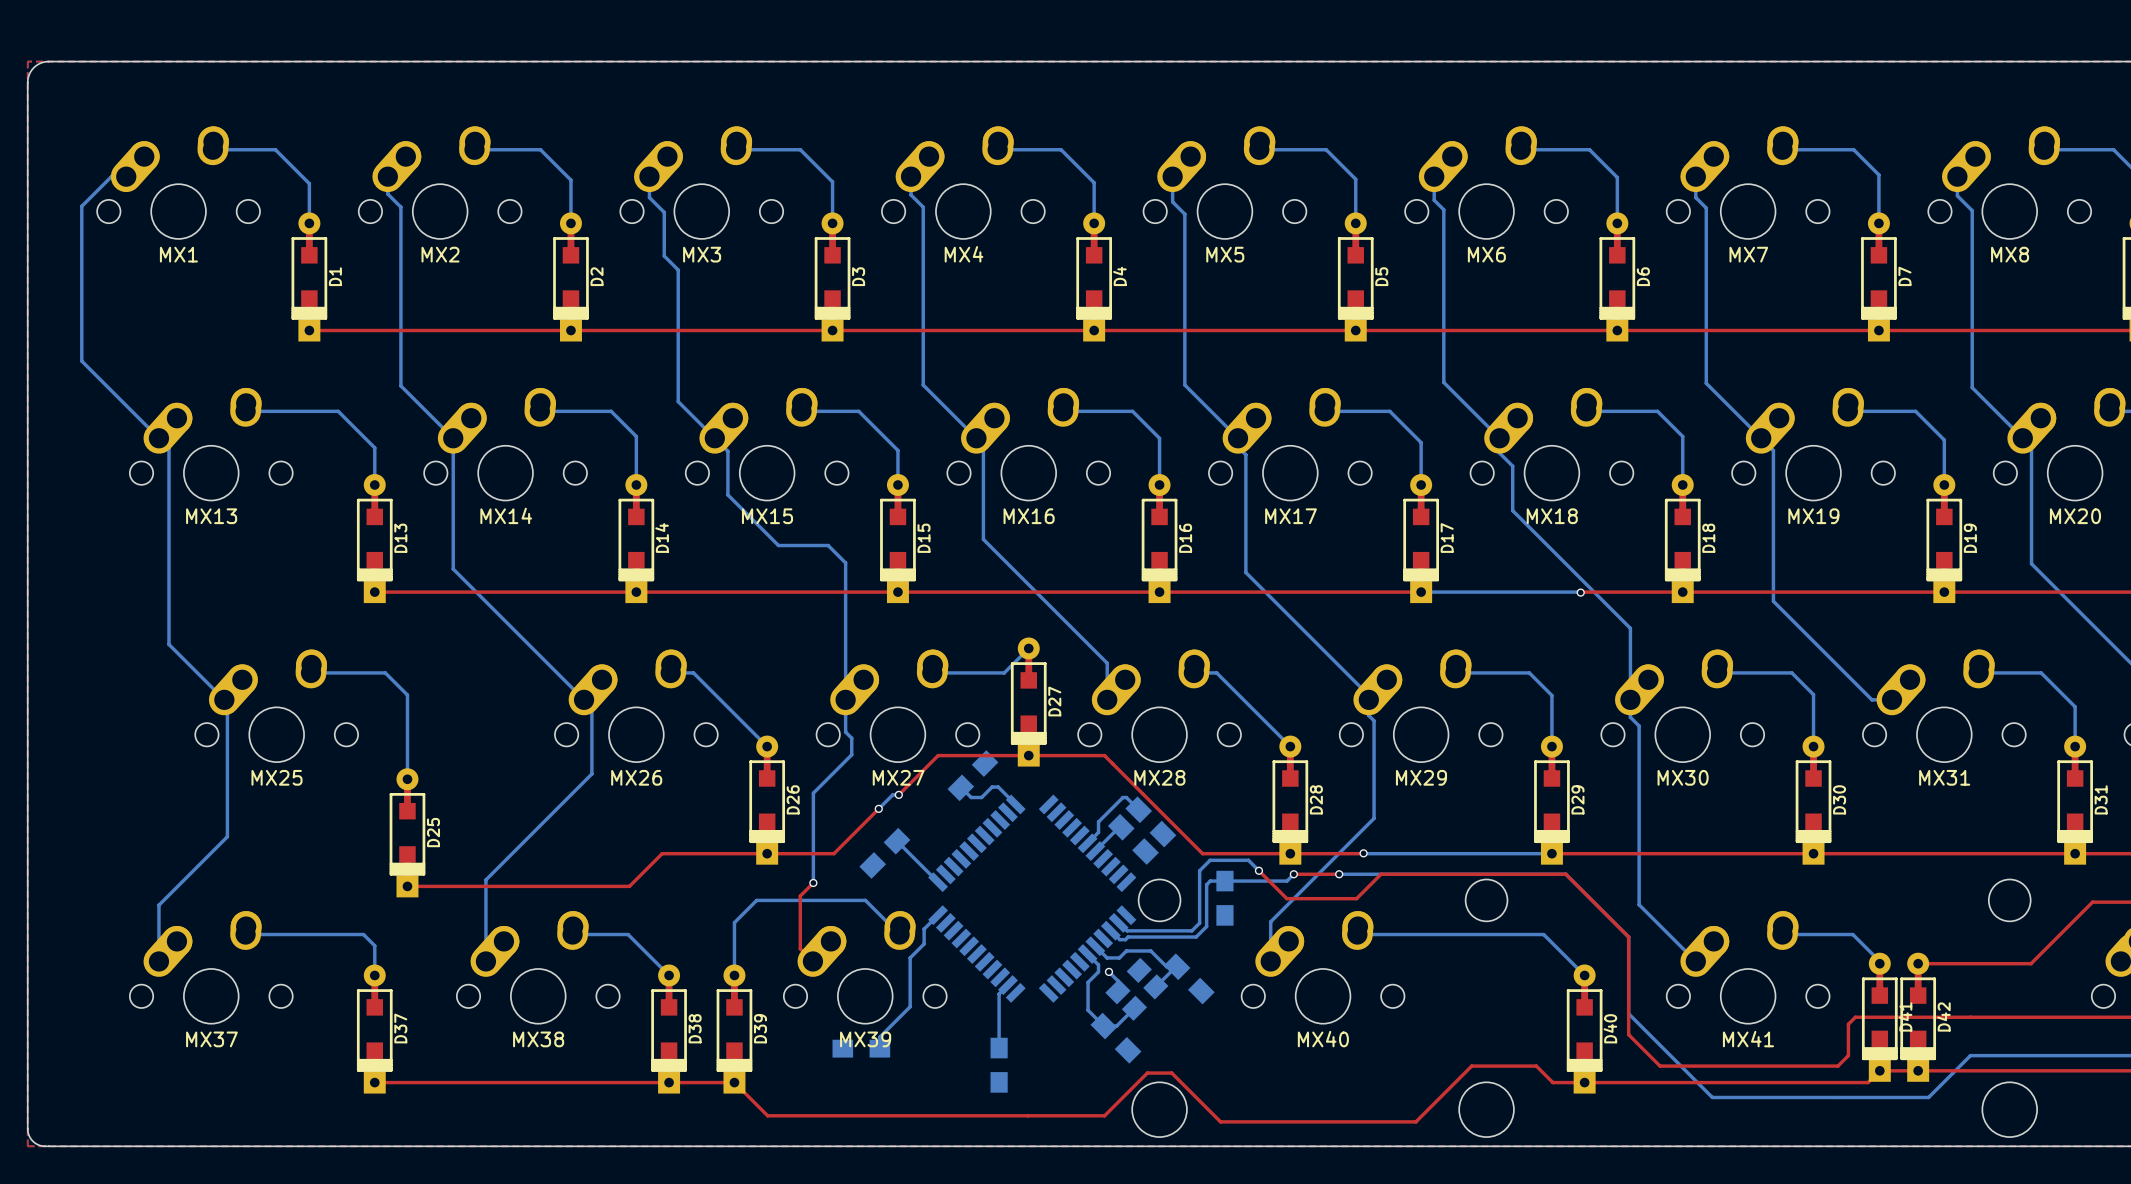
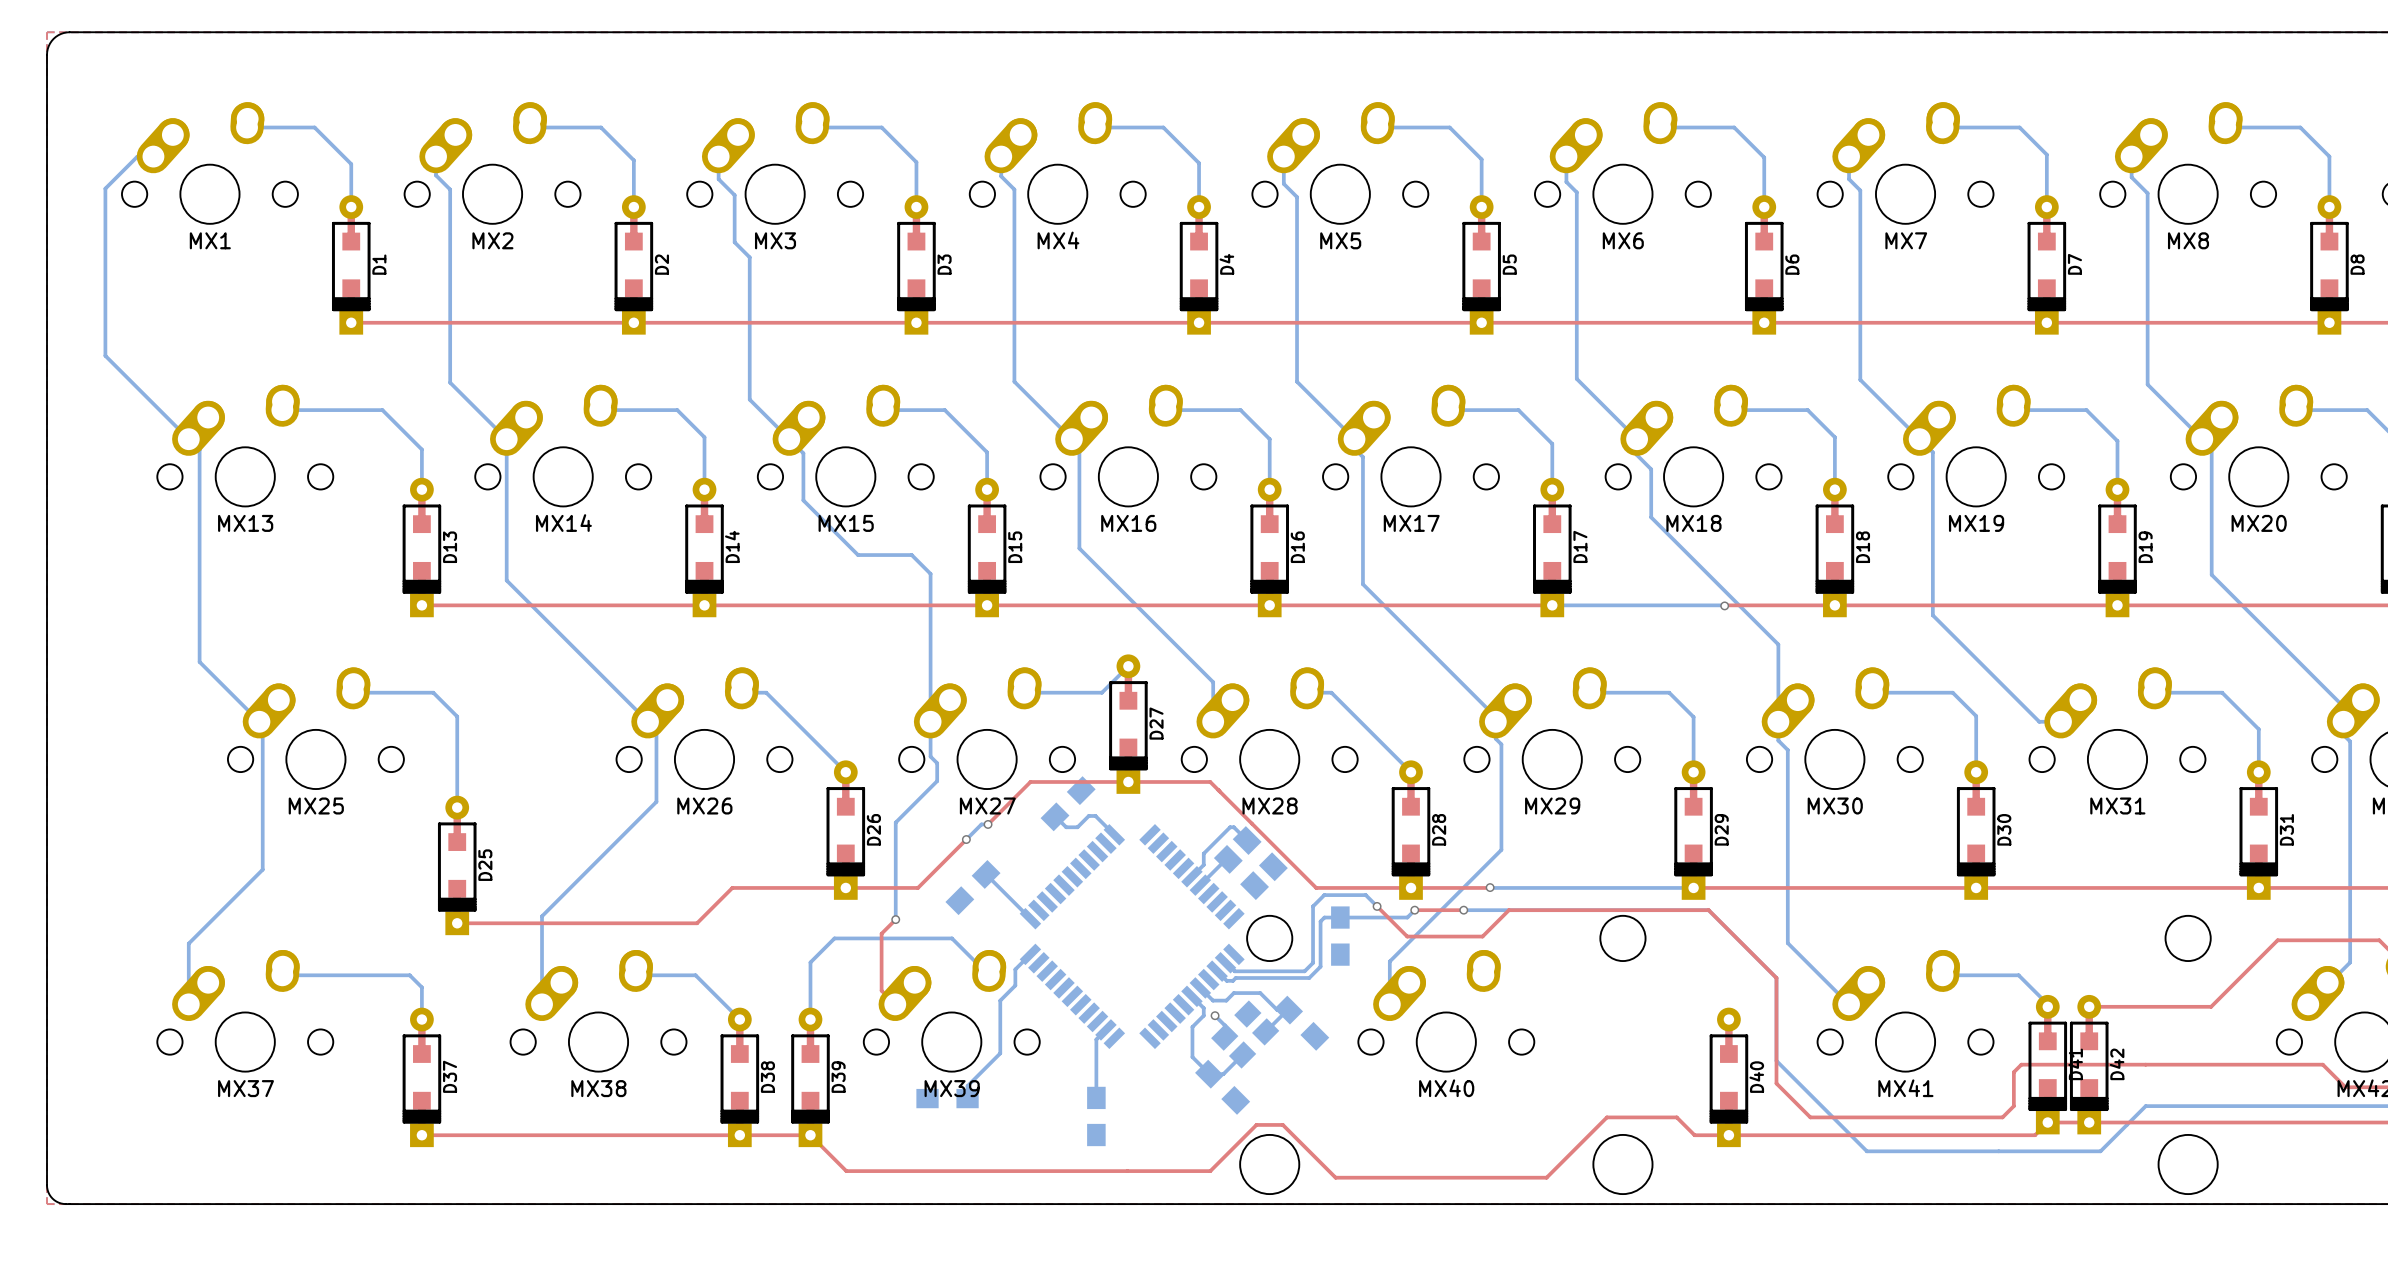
bottom track: (1357, 934) (1543, 934) (1584, 975) -> none

